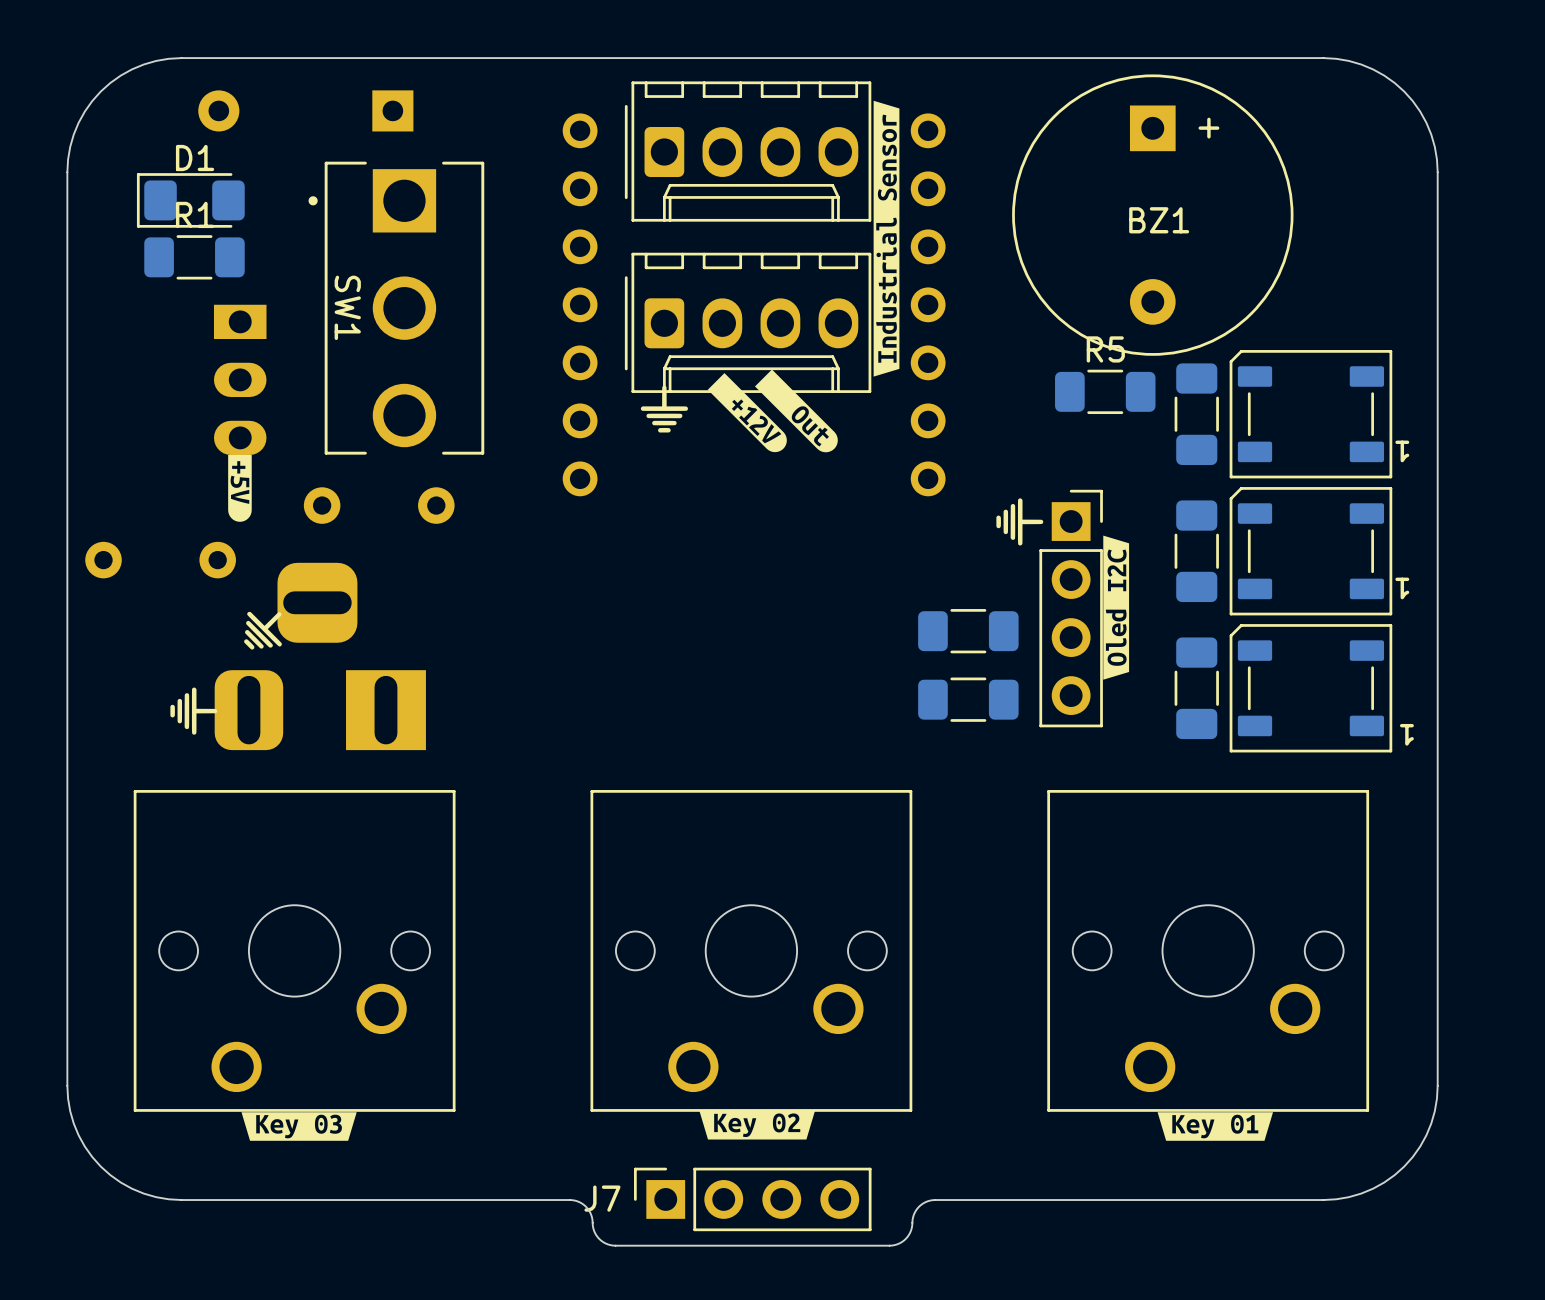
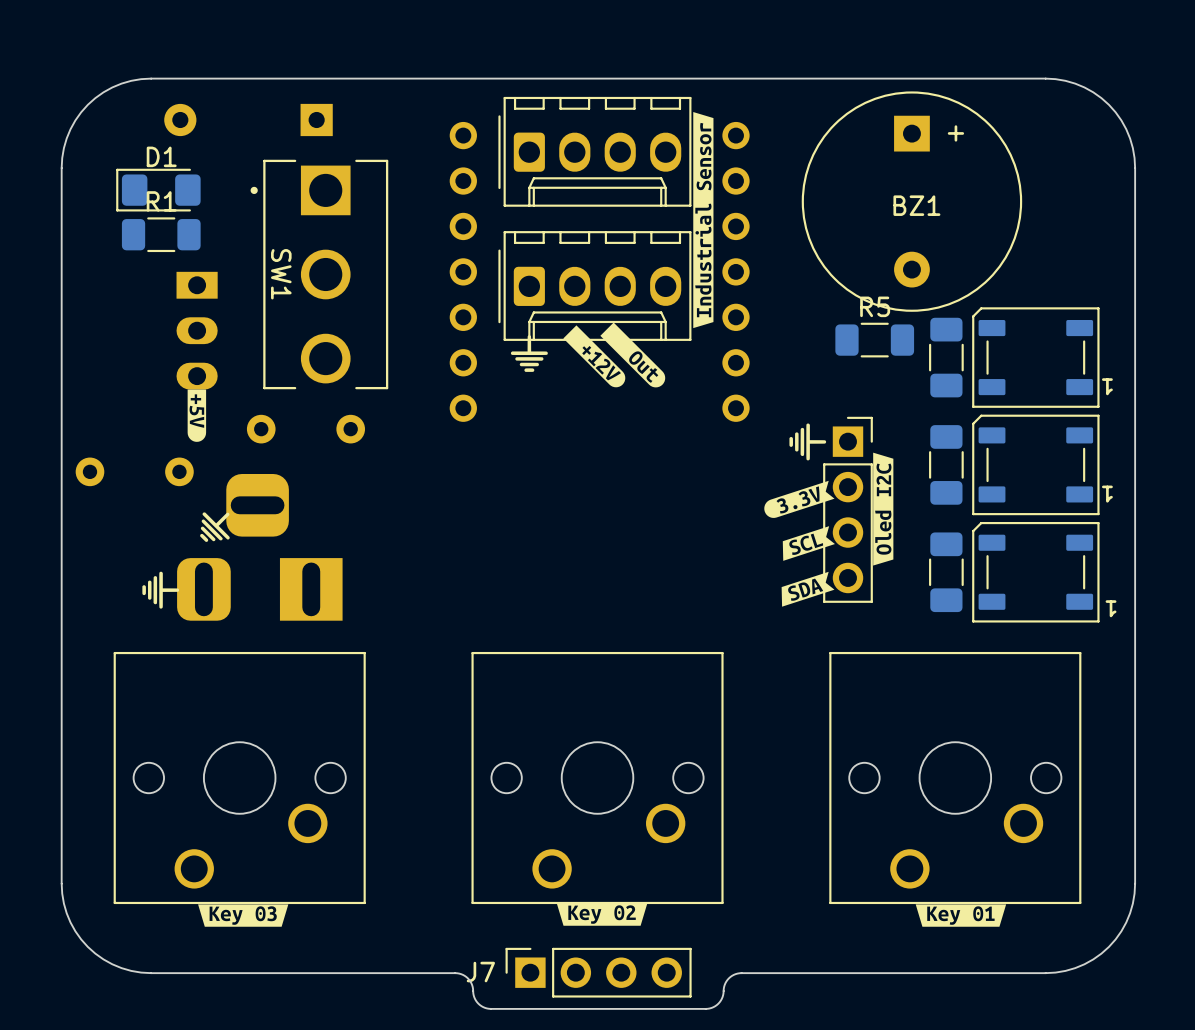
drawing: none -> [764, 480, 835, 607]
part: (968, 631) -> none
part: (968, 699) -> none

